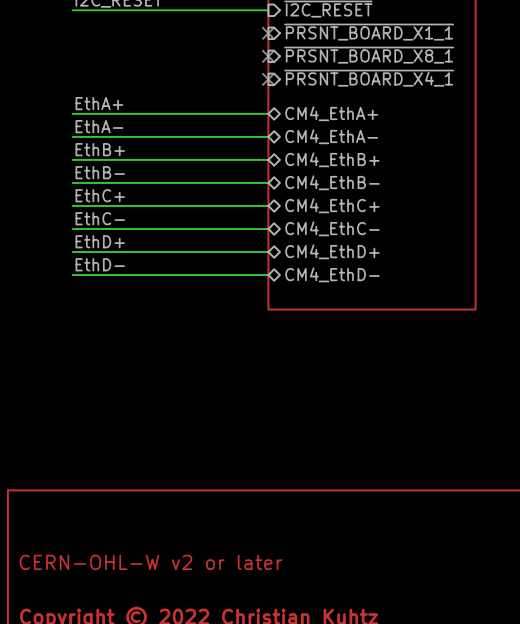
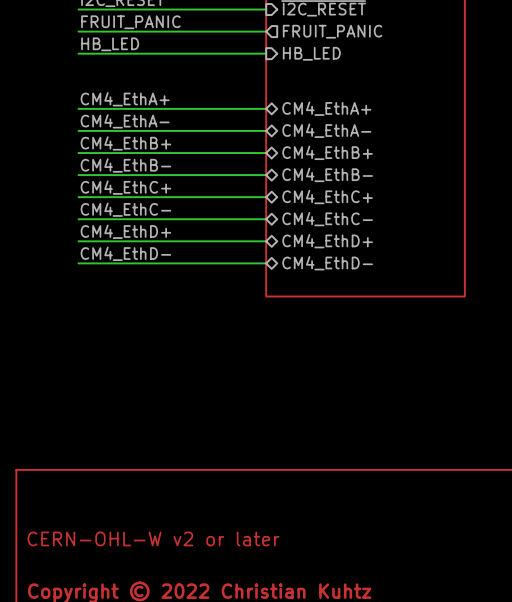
label: none -> FRUIT_PANIC (130, 22)
sheet pin shape: input (369, 32) -> output (332, 31)
sheet pin: ~{PRSNT_BOARD_X1_1} (369, 32) -> FRUIT_PANIC (332, 31)
wire: none -> (78, 31) (266, 31)
no-connect mark: (268, 33) -> none
label: none -> HB_LED (110, 44)
sheet pin: ~{PRSNT_BOARD_X8_1} (369, 55) -> HB_LED (311, 53)
wire: none -> (78, 53) (266, 53)
no-connect mark: (268, 56) -> none
sheet pin: ~{PRSNT_BOARD_X4_1} (369, 78) -> none
no-connect mark: (268, 79) -> none
label: EthA+ (99, 103) -> CM4_EthA+ (125, 99)
label: EthA- (99, 126) -> CM4_EthA- (125, 121)
label: EthB+ (100, 149) -> CM4_EthB+ (125, 143)
label: EthB- (100, 172) -> CM4_EthB- (125, 165)
label: EthC+ (100, 195) -> CM4_EthC+ (125, 187)
label: EthC- (100, 218) -> CM4_EthC- (125, 209)
label: EthD+ (100, 241) -> CM4_EthD+ (125, 231)
label: EthD- (100, 264) -> CM4_EthD- (125, 253)

